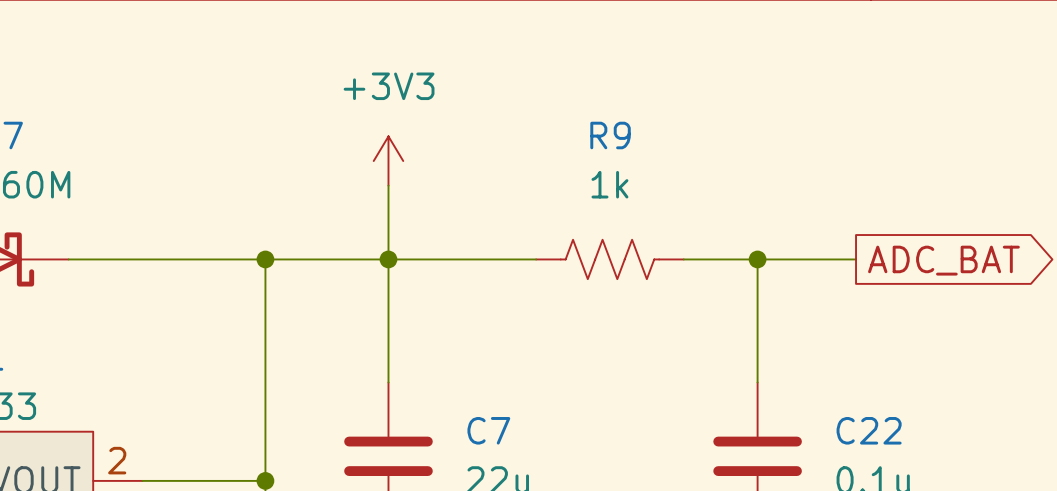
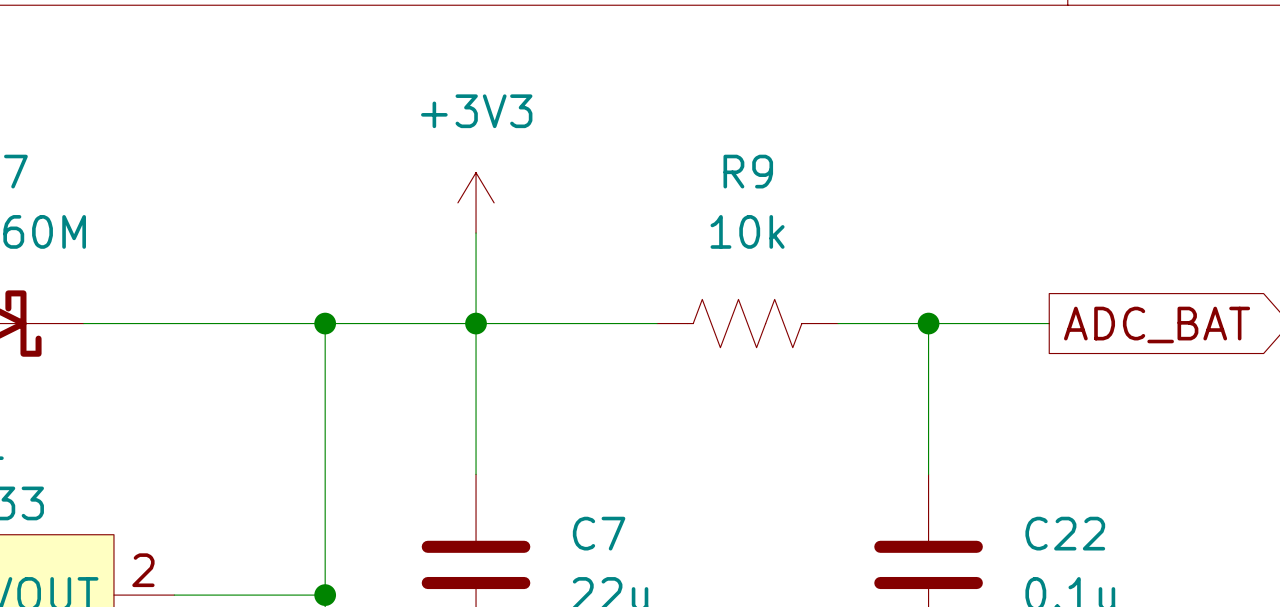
R9 value: 1k (609, 184) -> 10k (747, 231)

